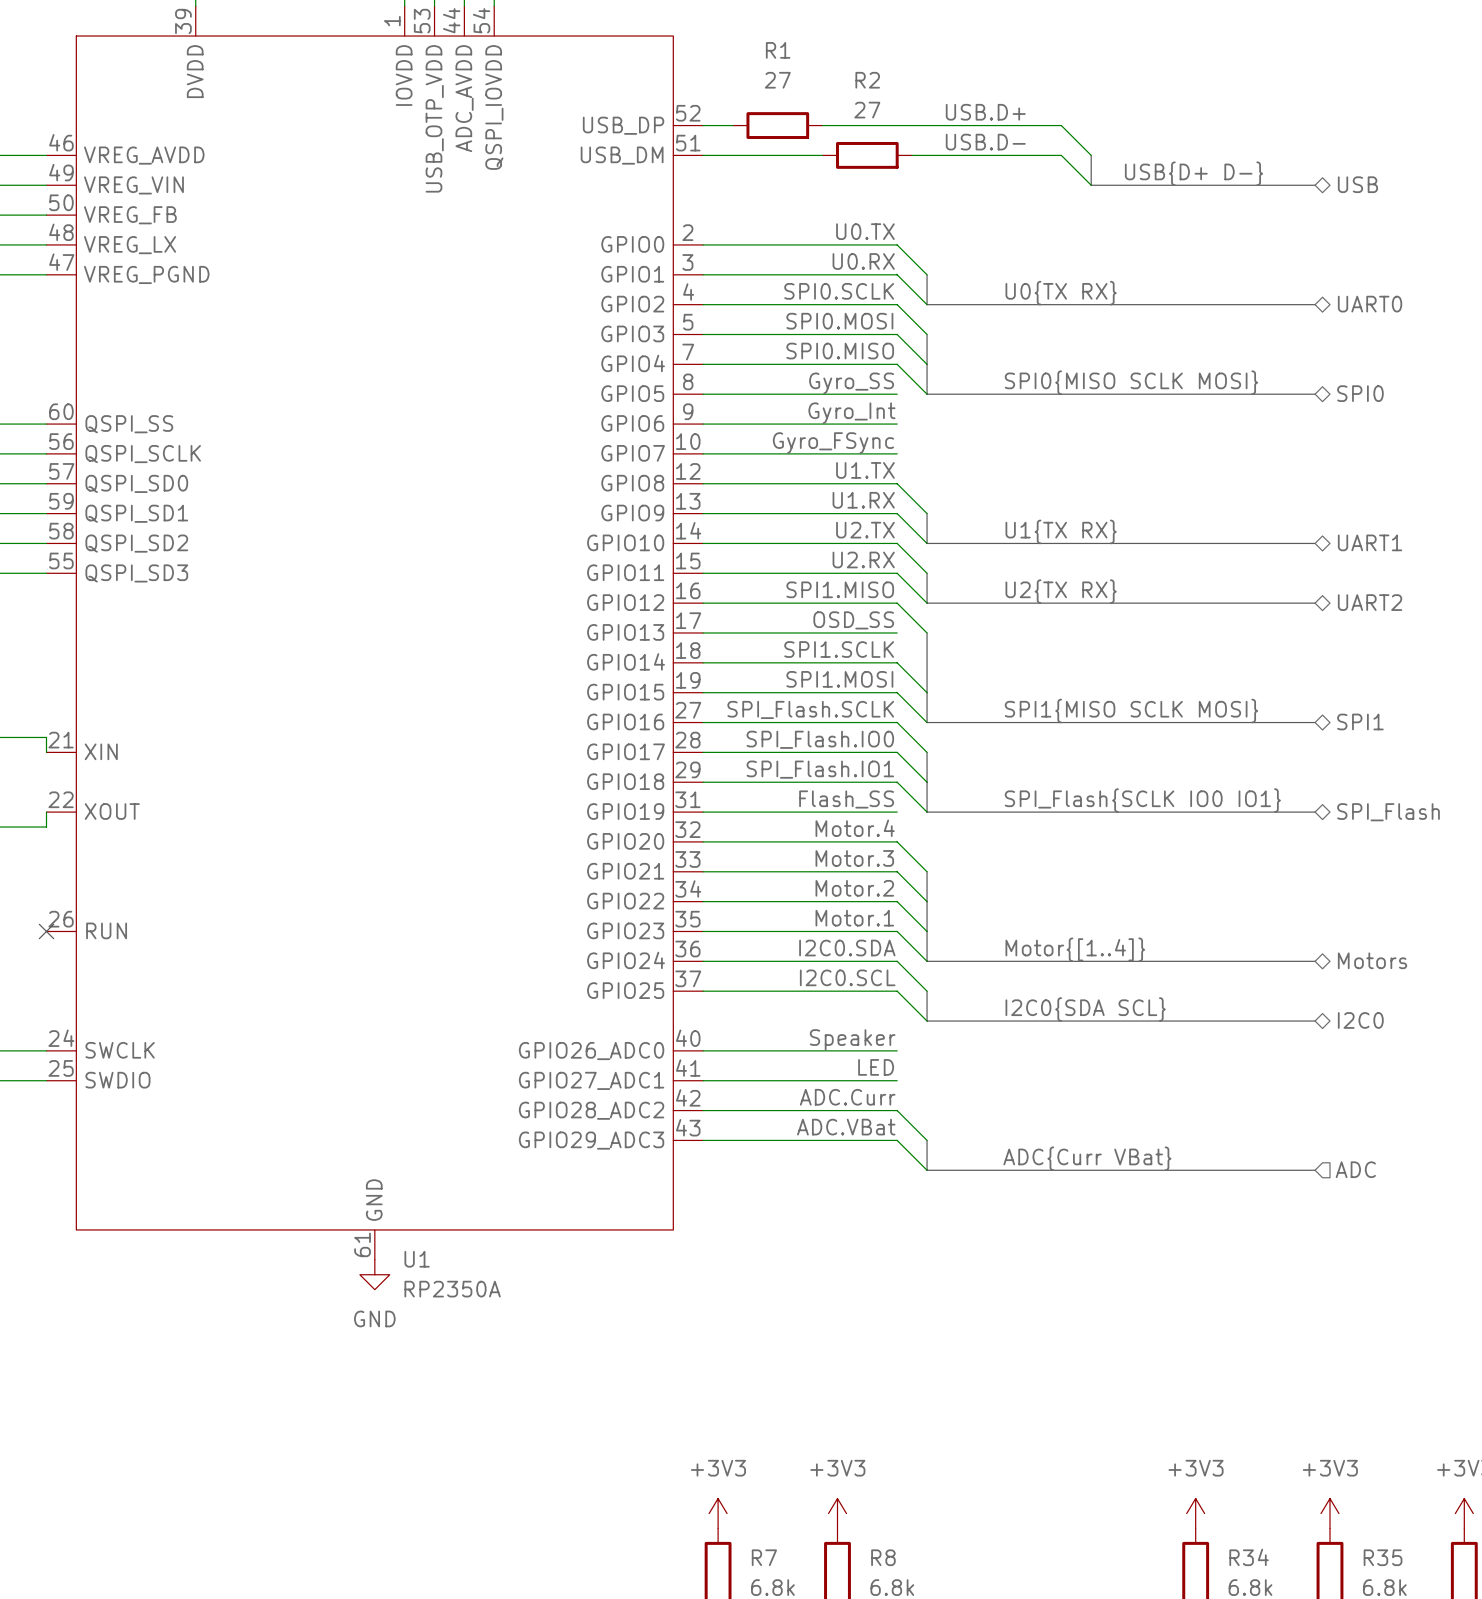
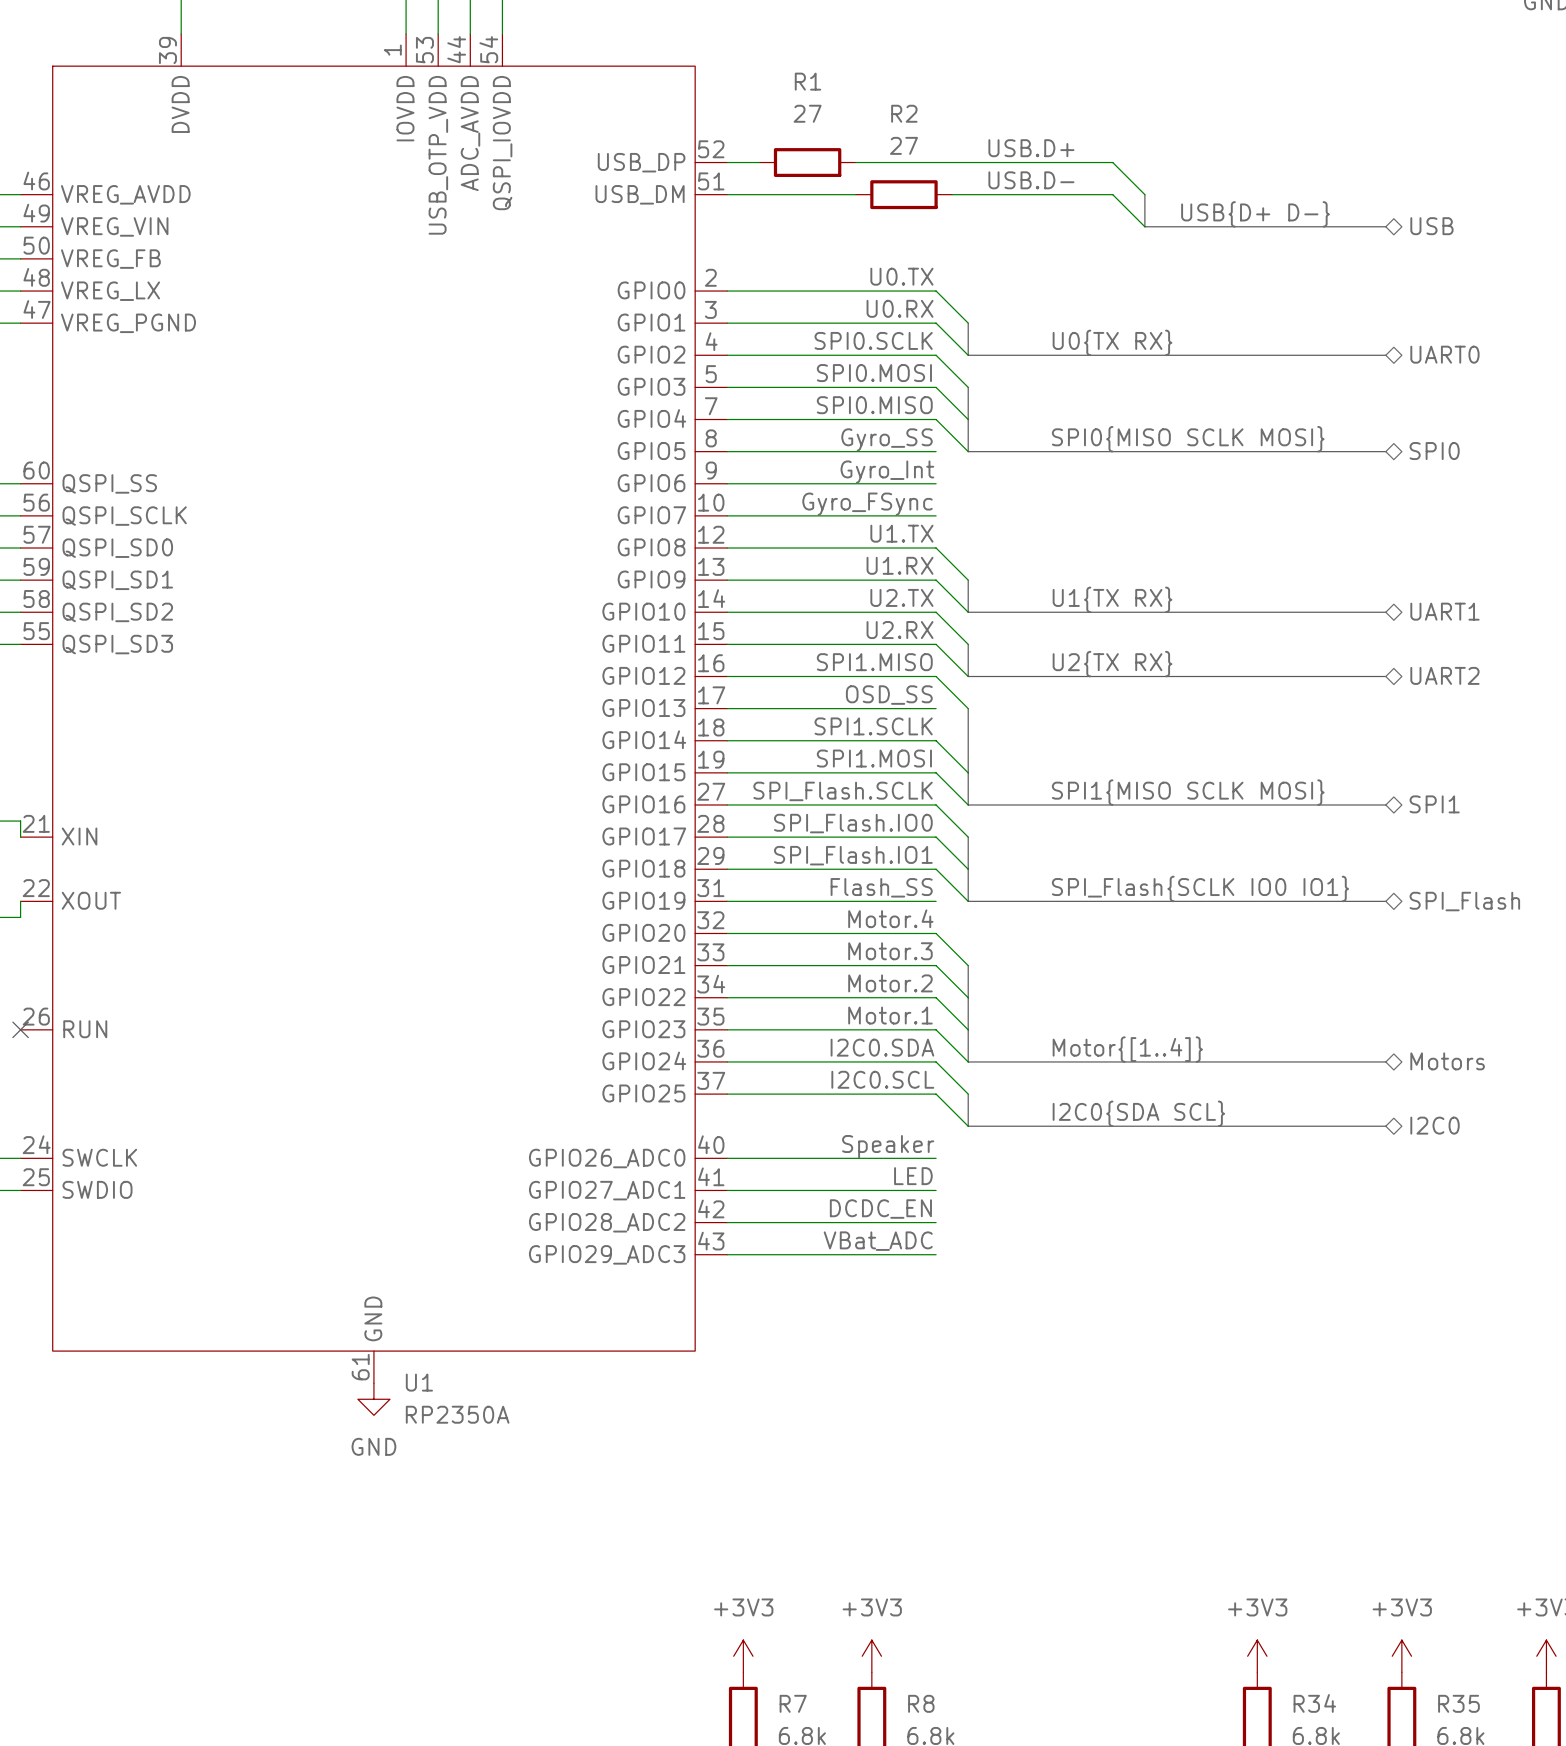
label: ADC.Curr (847, 1097) -> DCDC_EN (880, 1209)
wire: (897, 1110) (927, 1140) -> none
label: ADC.VBat (846, 1127) -> VBat_ADC (878, 1241)
wire: (897, 1140) (927, 1170) -> none
bus: (927, 1140) (927, 1170) (1315, 1170) -> none
label: ADC{Curr VBat} (1087, 1158) -> none
hierarchical label: ADC (1355, 1169) -> none

